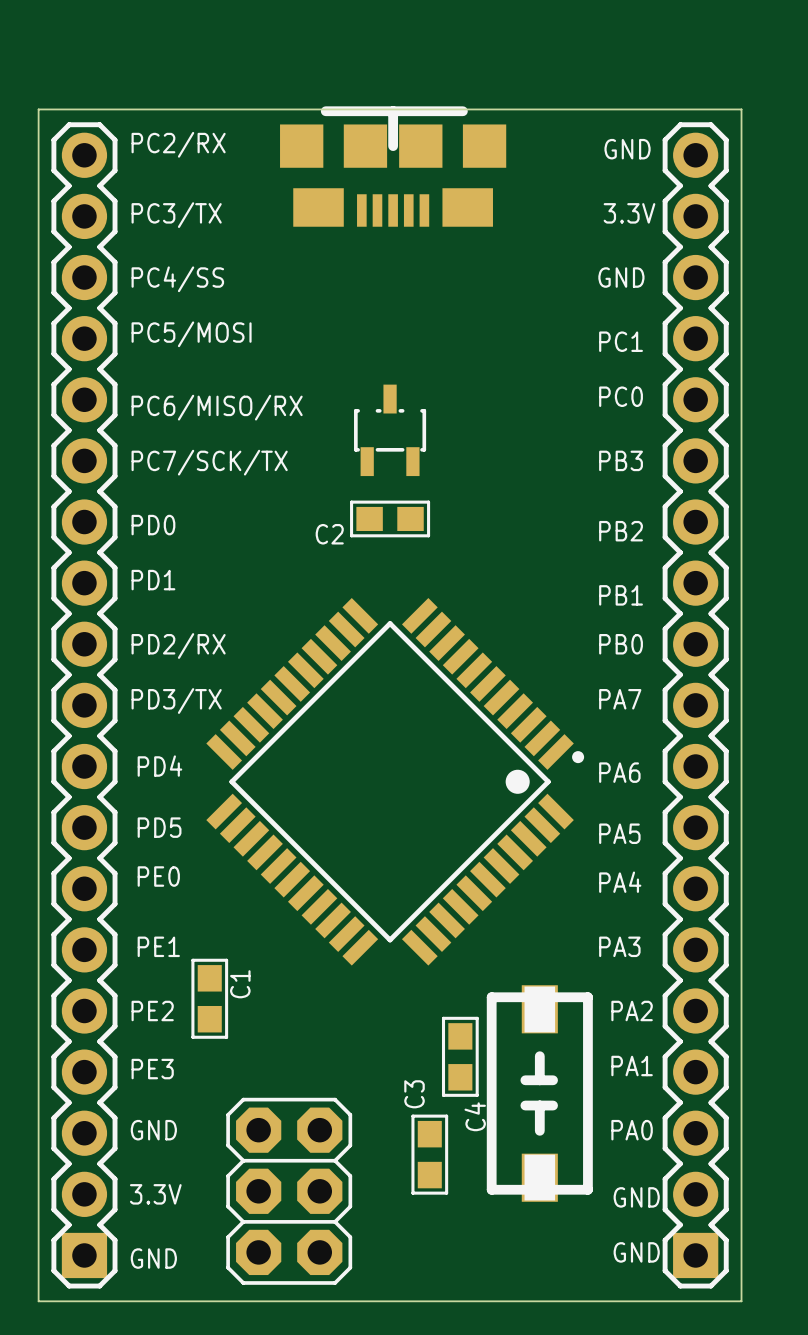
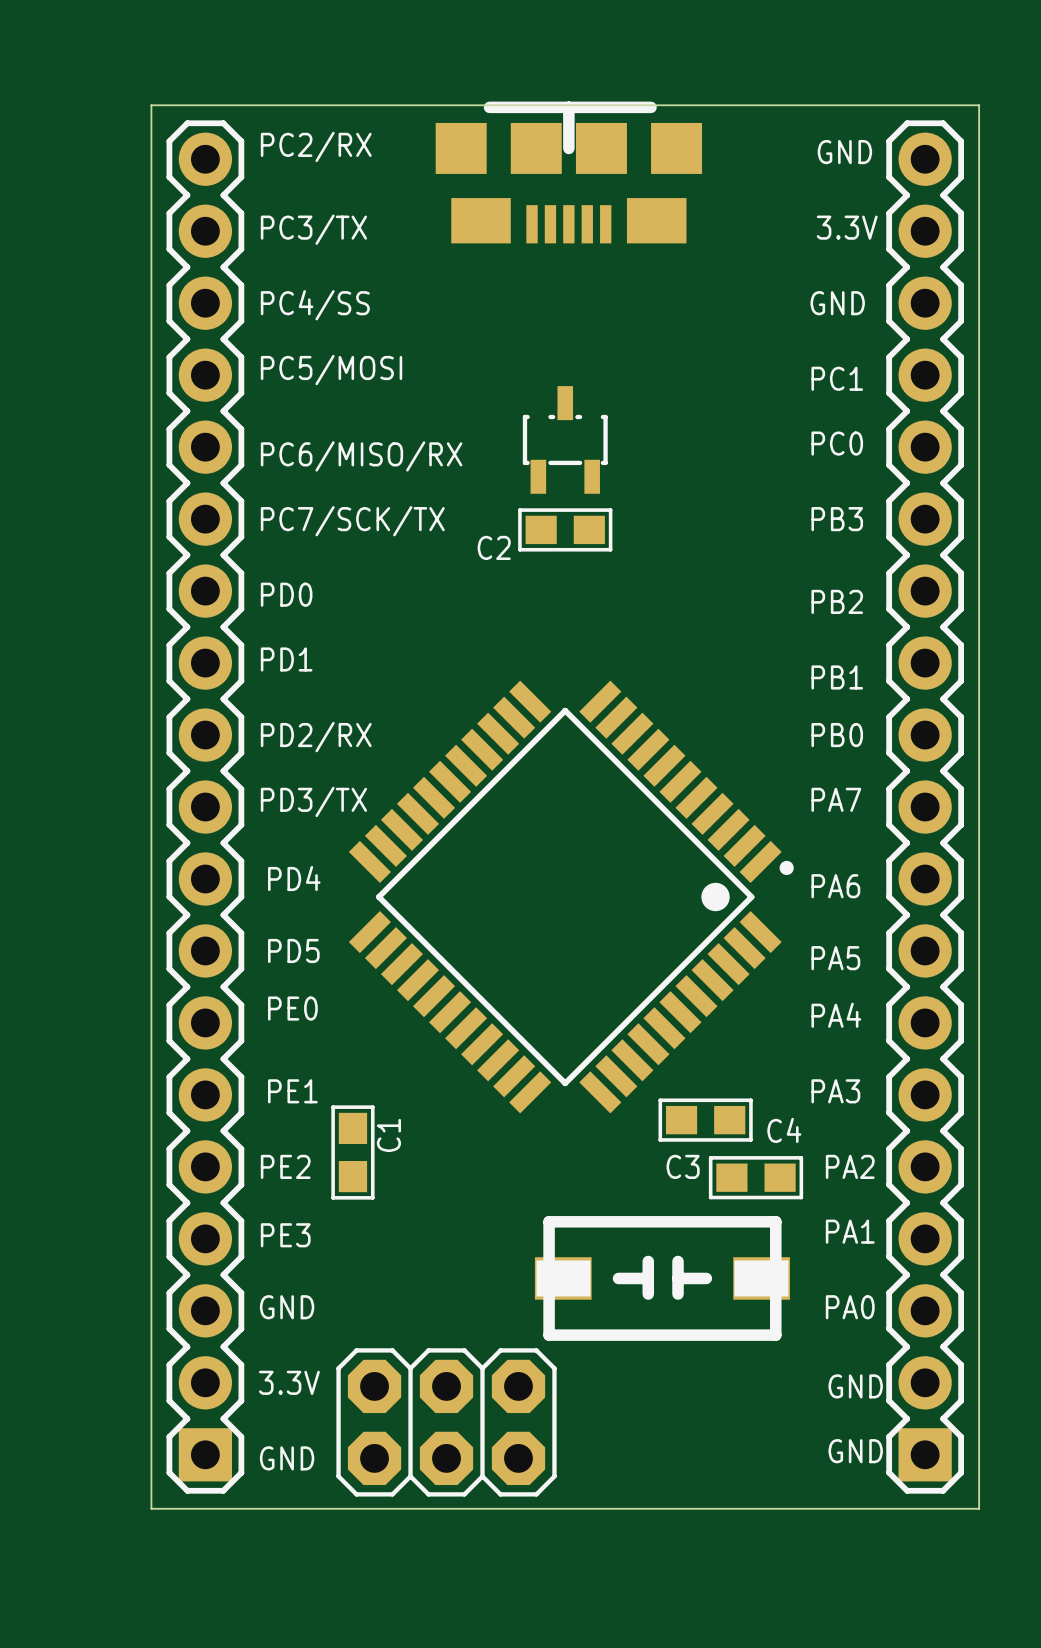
part position: (390, 430) -> (565, 439)
C2 position: (390, 518) -> (565, 529)
C4 rotation: 0° (460, 1056) -> 90° clockwise (756, 1177)
C4 position: (460, 1056) -> (756, 1177)
part rotation: 0° (539, 1093) -> 90° clockwise (662, 1278)
C3 name position: C3 (414, 1094) -> C3 (683, 1166)
C4 name position: C4 (475, 1116) -> C4 (784, 1130)
C3 rotation: 0° (429, 1154) -> 90° clockwise (705, 1120)
C3 position: (429, 1154) -> (705, 1120)
part rotation: 0° (289, 1191) -> 90° clockwise (446, 1422)

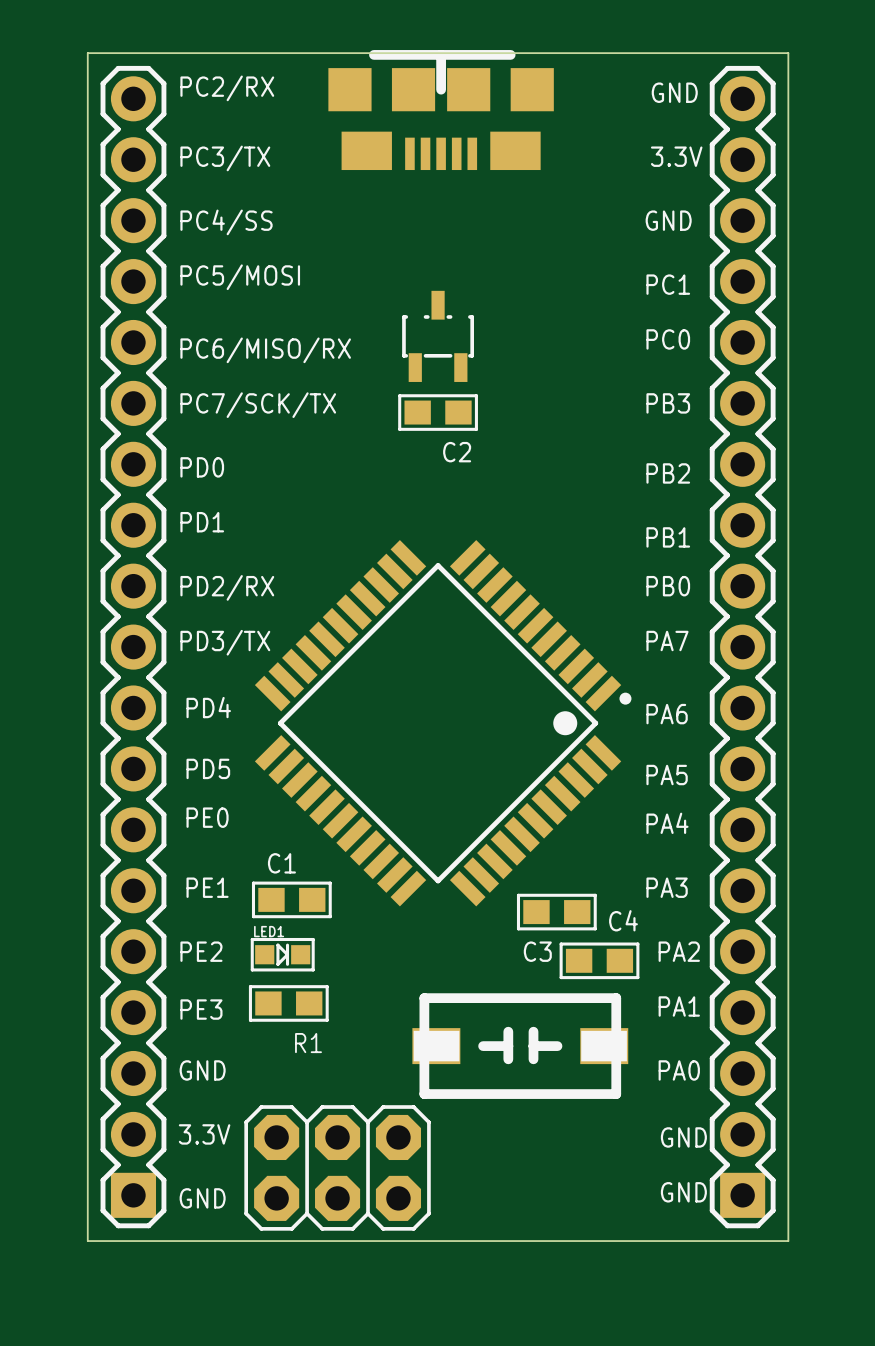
C2 name position: C2 (494, 547) -> C2 (457, 452)
C1 rotation: 0° (352, 1152) -> 90° clockwise (291, 899)
C1 position: (352, 1152) -> (291, 899)
LED1: none -> (282, 954)
R1: none -> (288, 1003)

